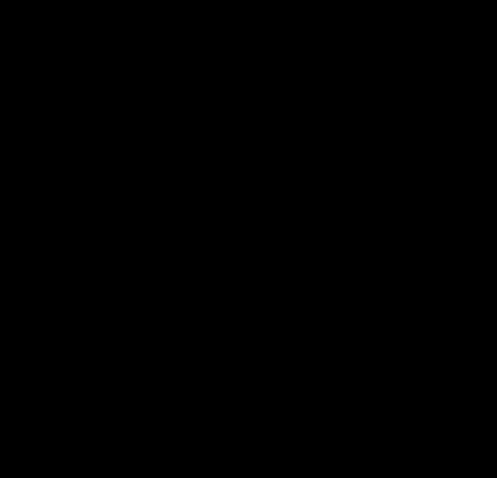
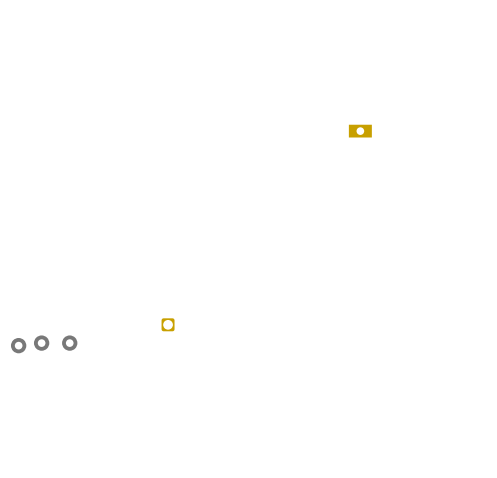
part: none -> (360, 131)
part: none -> (168, 324)
via: none -> (41, 343)
via: none -> (69, 343)
via: none -> (18, 345)

